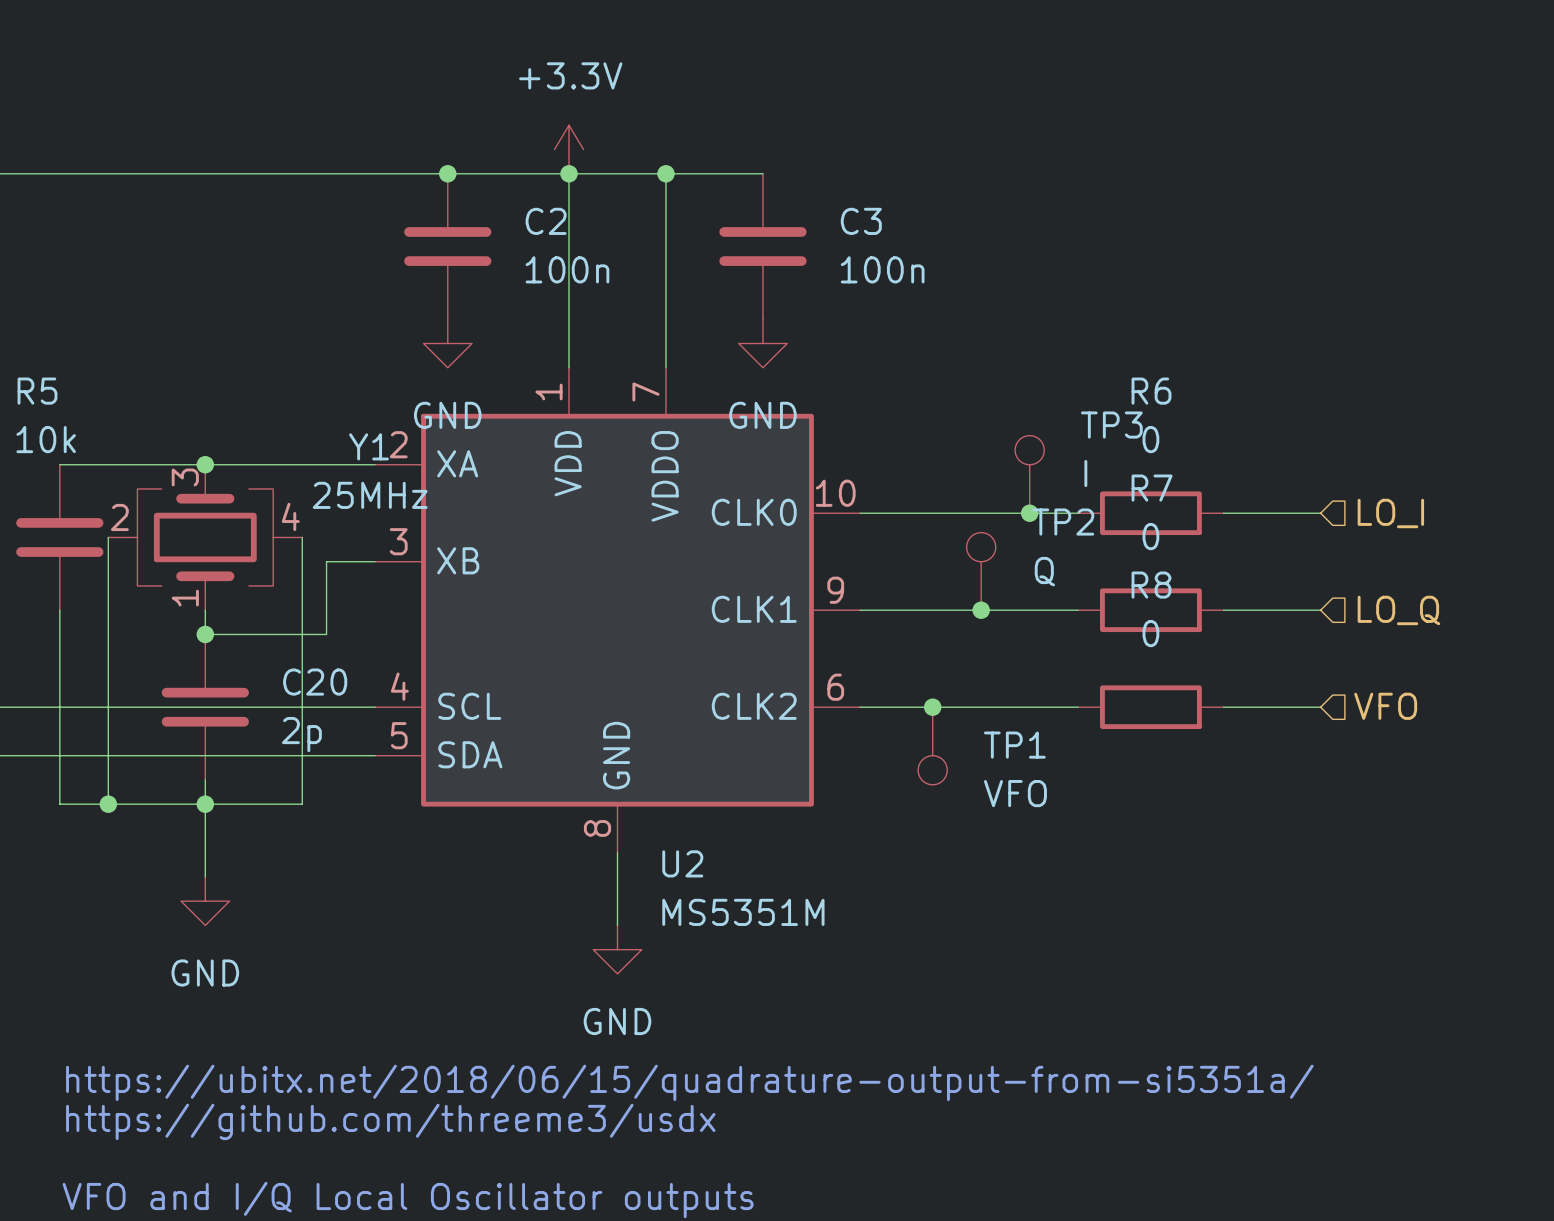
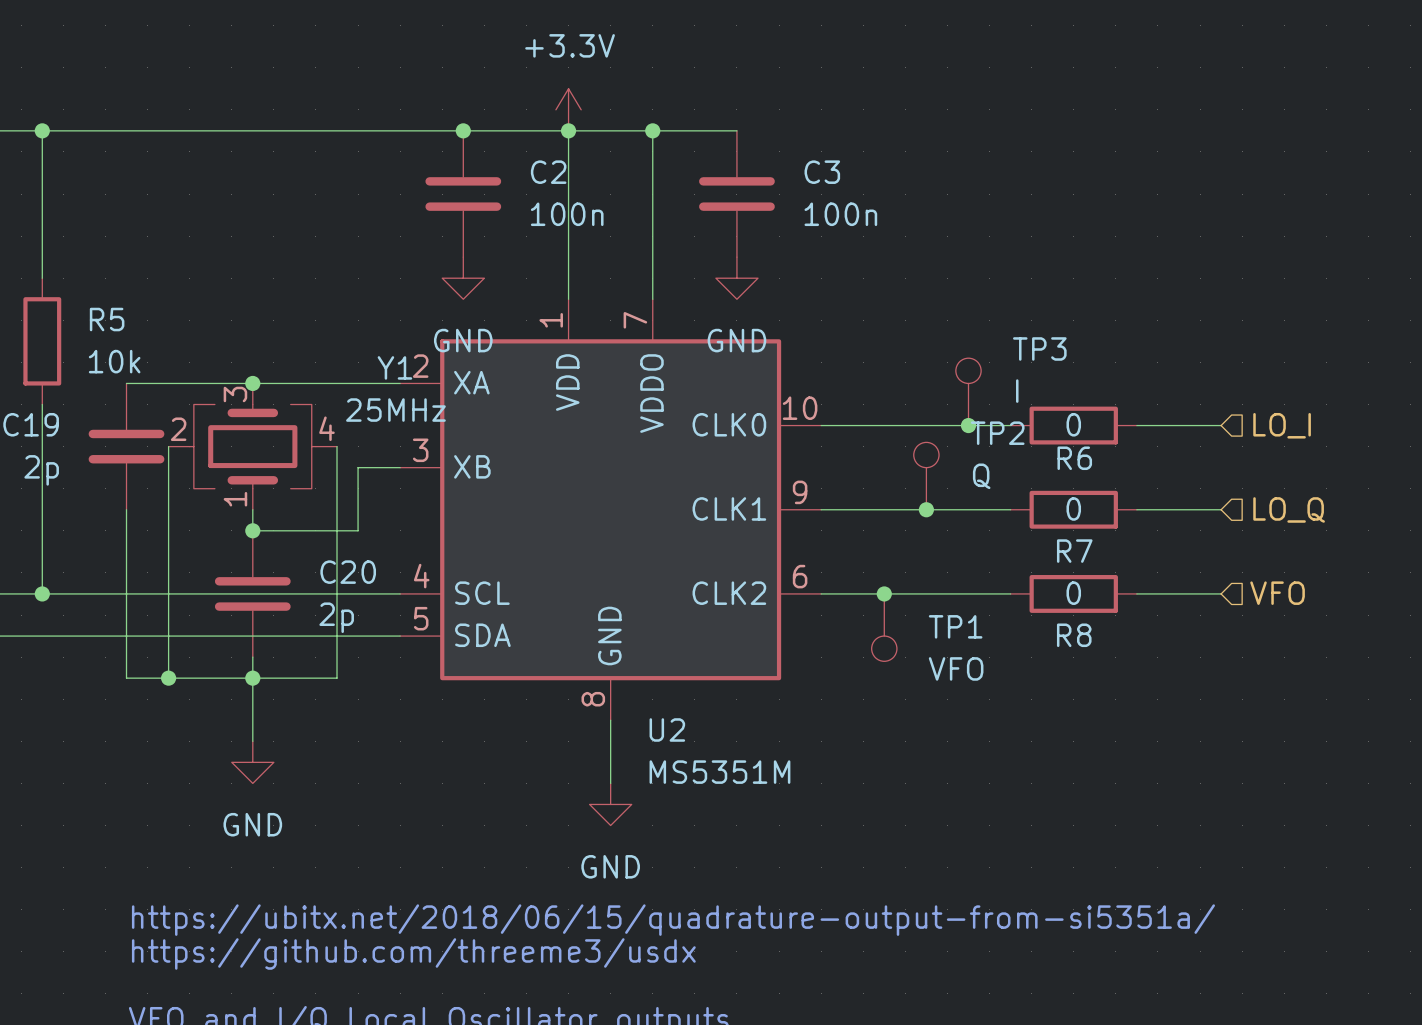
R6 name position: R6 (1151, 391) -> R6 (1074, 458)
R6 value position: 0 (1150, 439) -> 0 (1073, 424)
R7 name position: R7 (1152, 488) -> R7 (1074, 551)
R7 value position: 0 (1150, 536) -> 0 (1073, 508)
R8 name position: R8 (1151, 585) -> R8 (1074, 635)
R8 value position: 0 (1150, 633) -> 0 (1073, 593)

